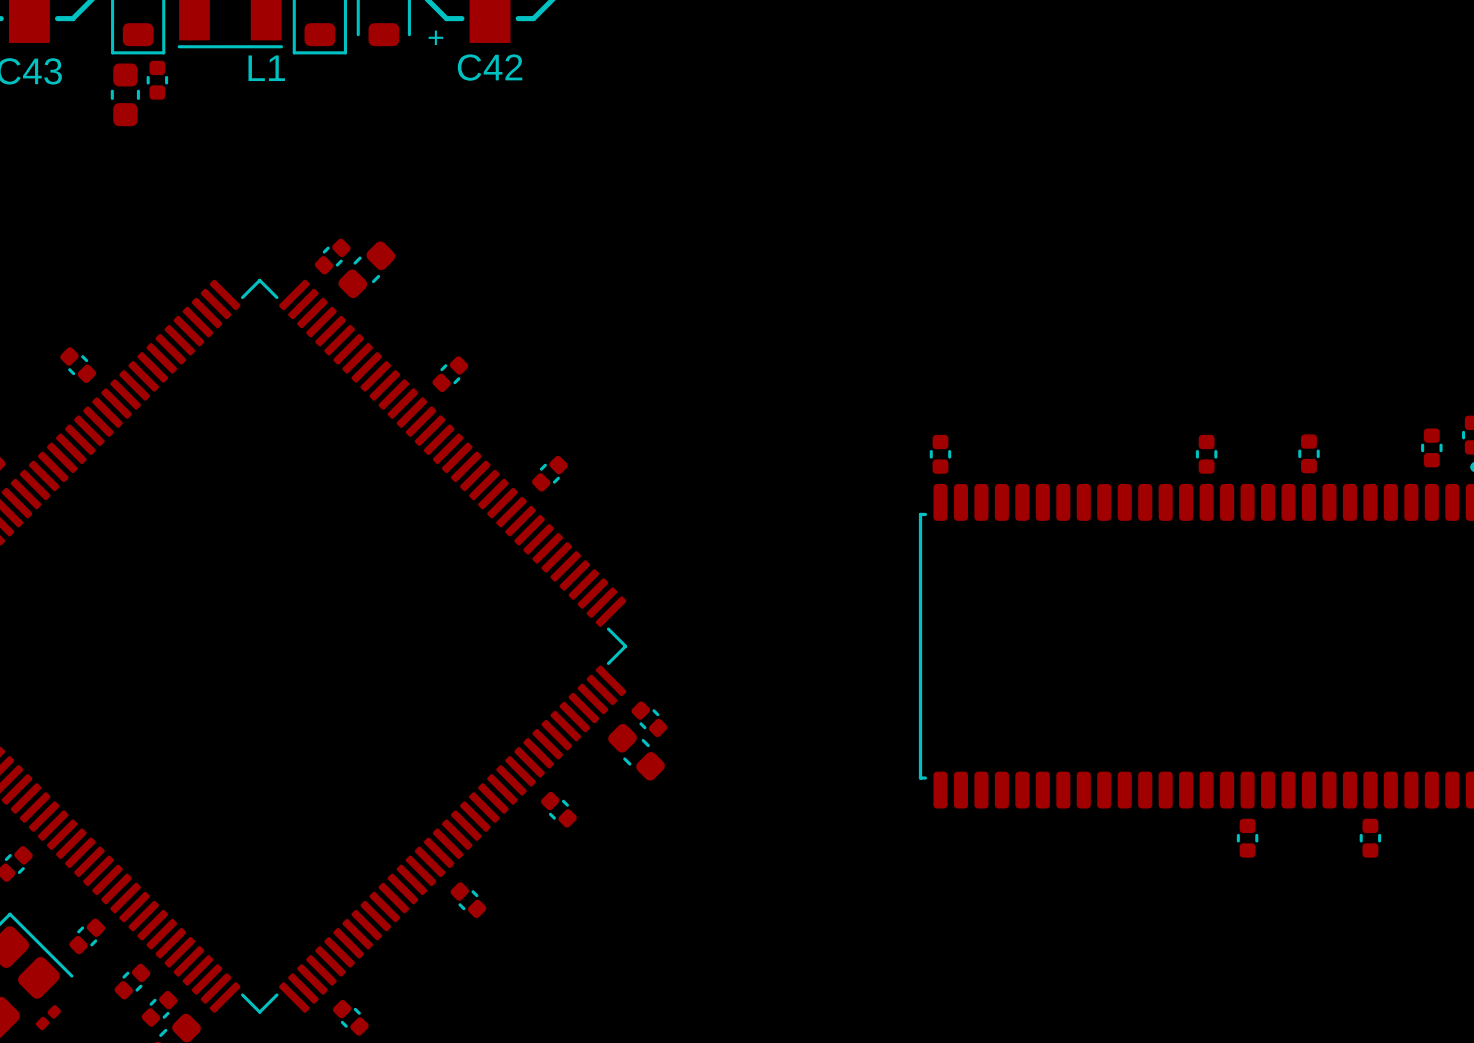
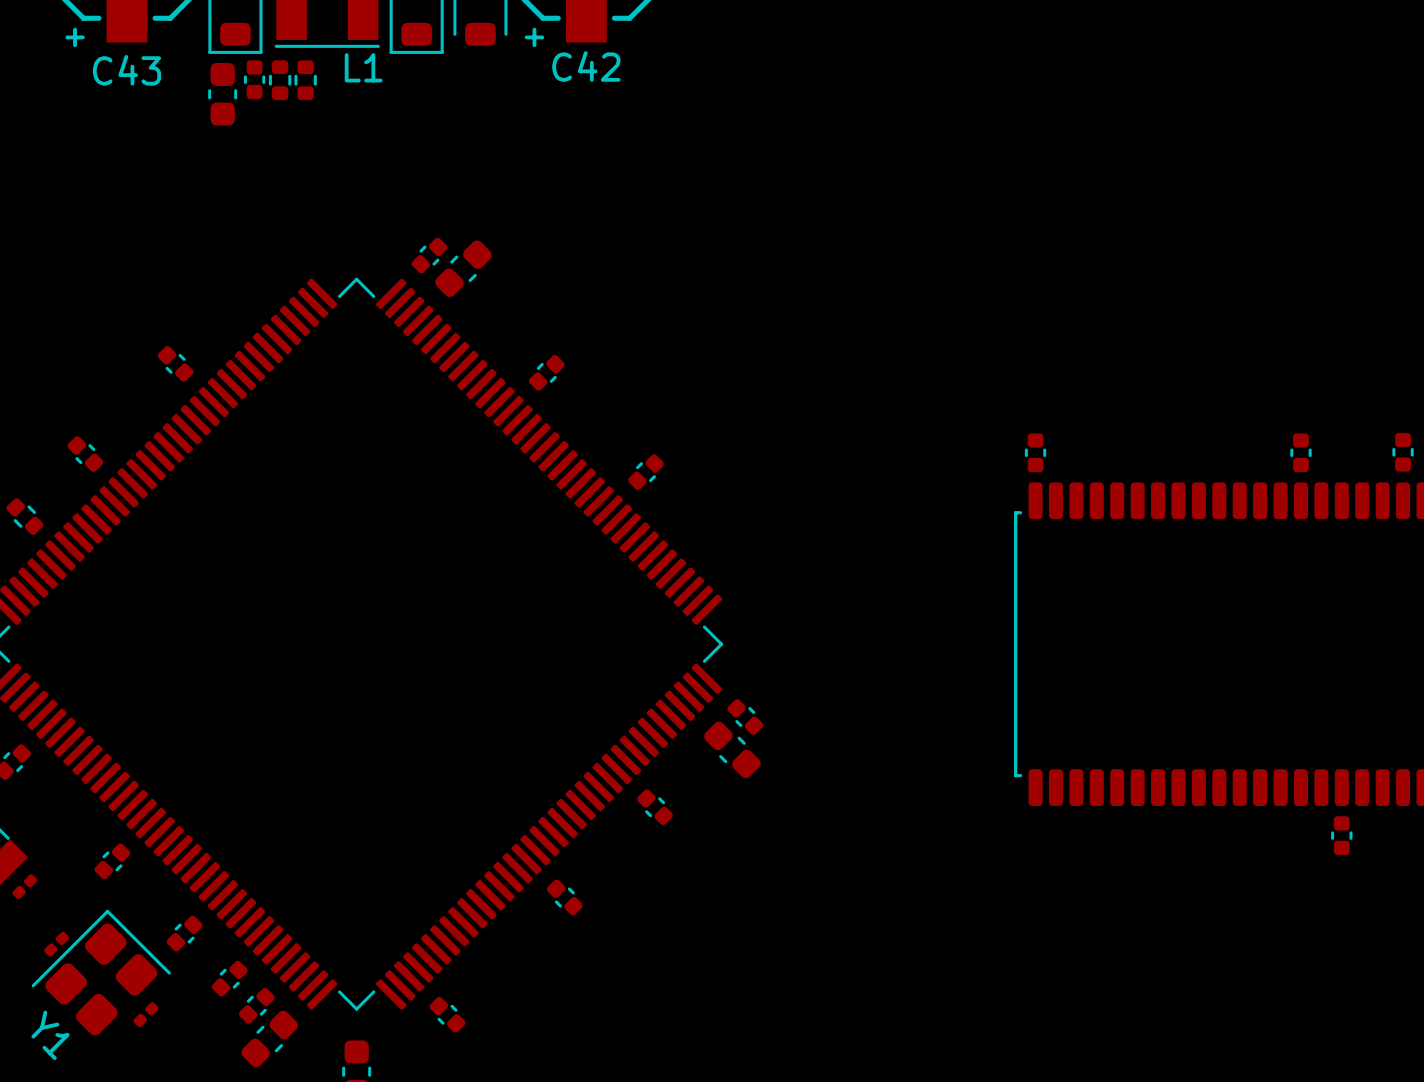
part: none -> (280, 80)
part: none -> (305, 80)

